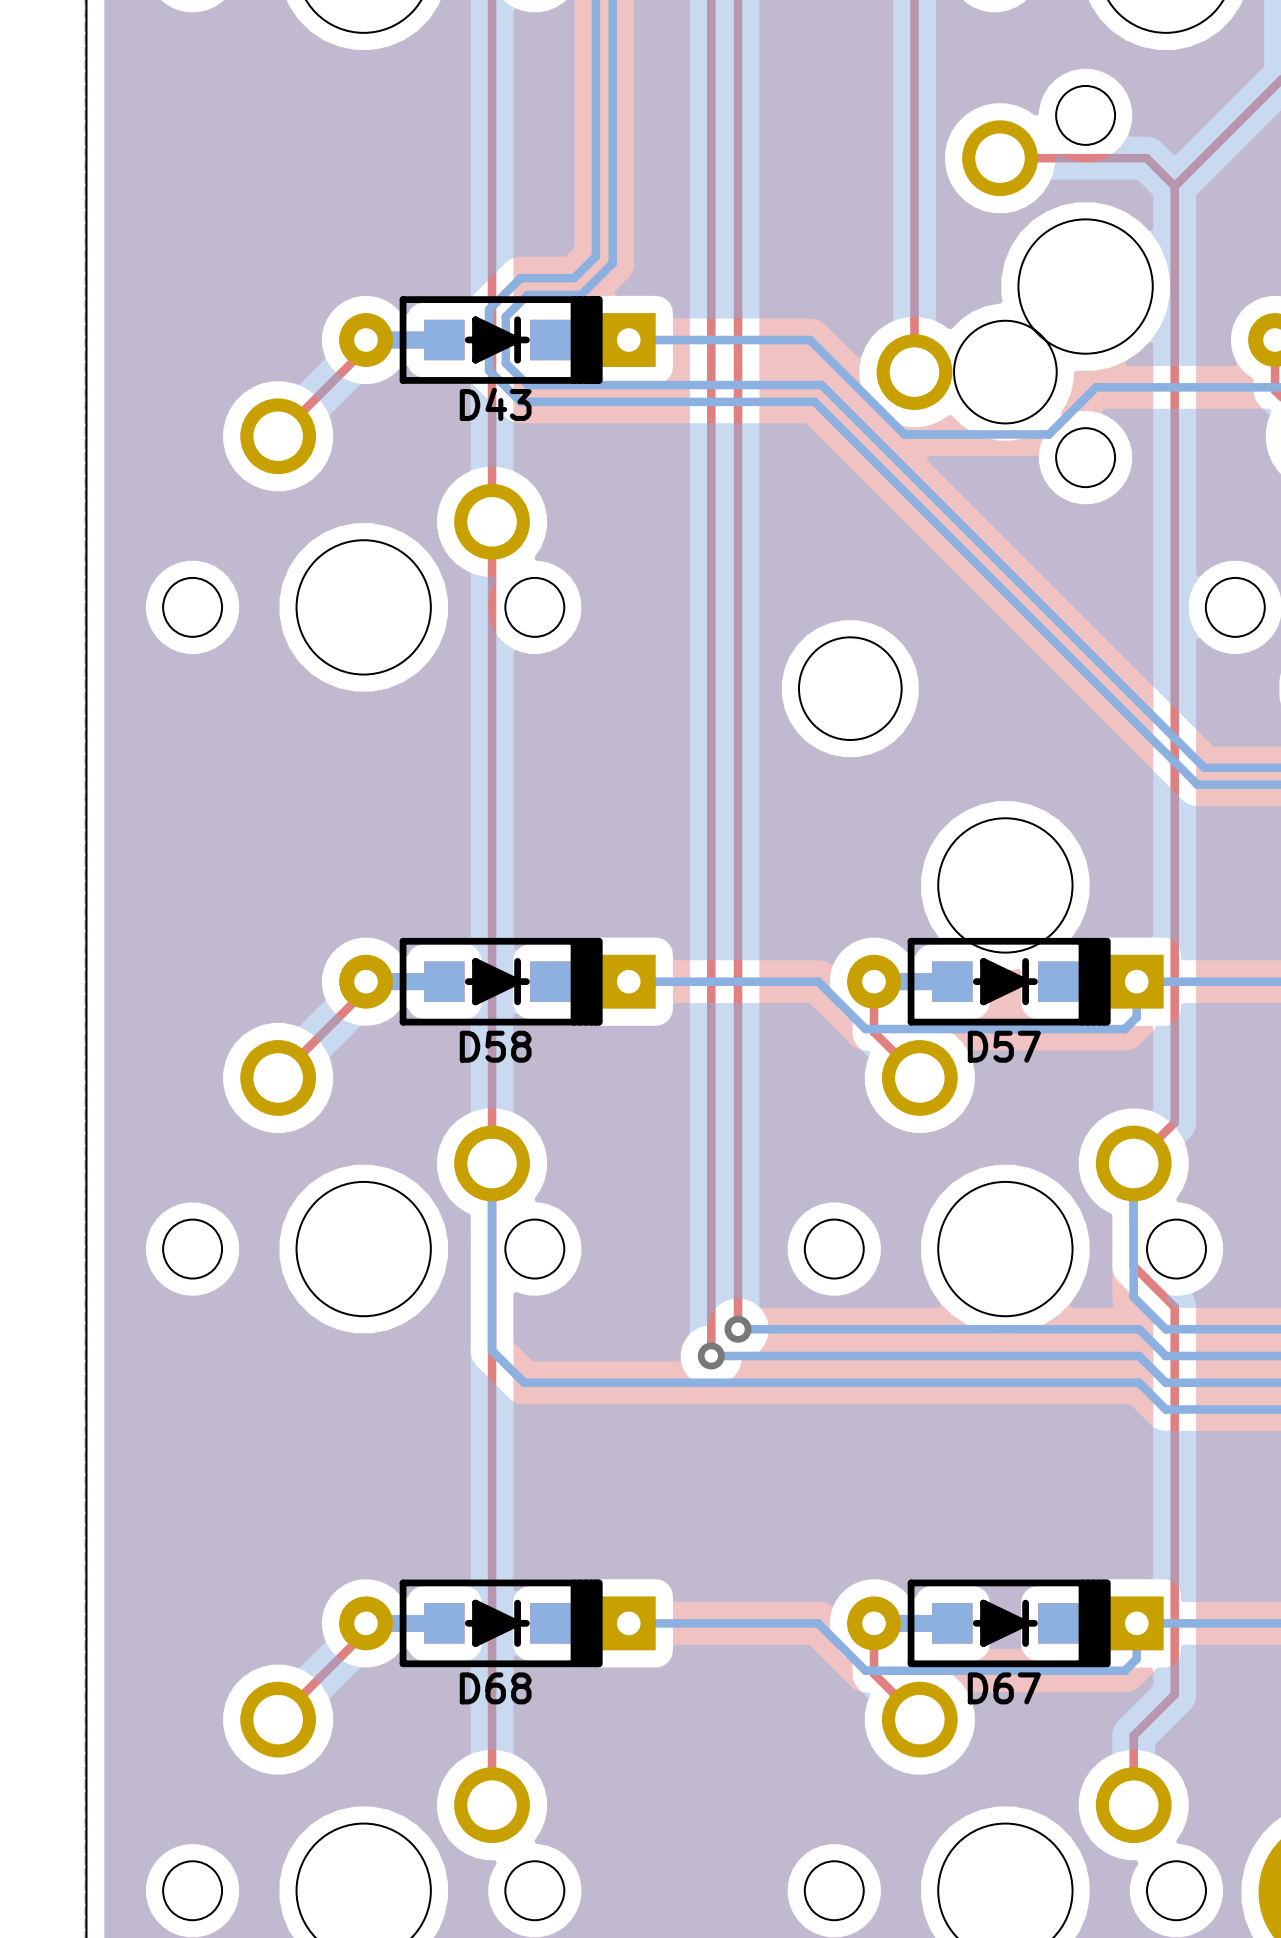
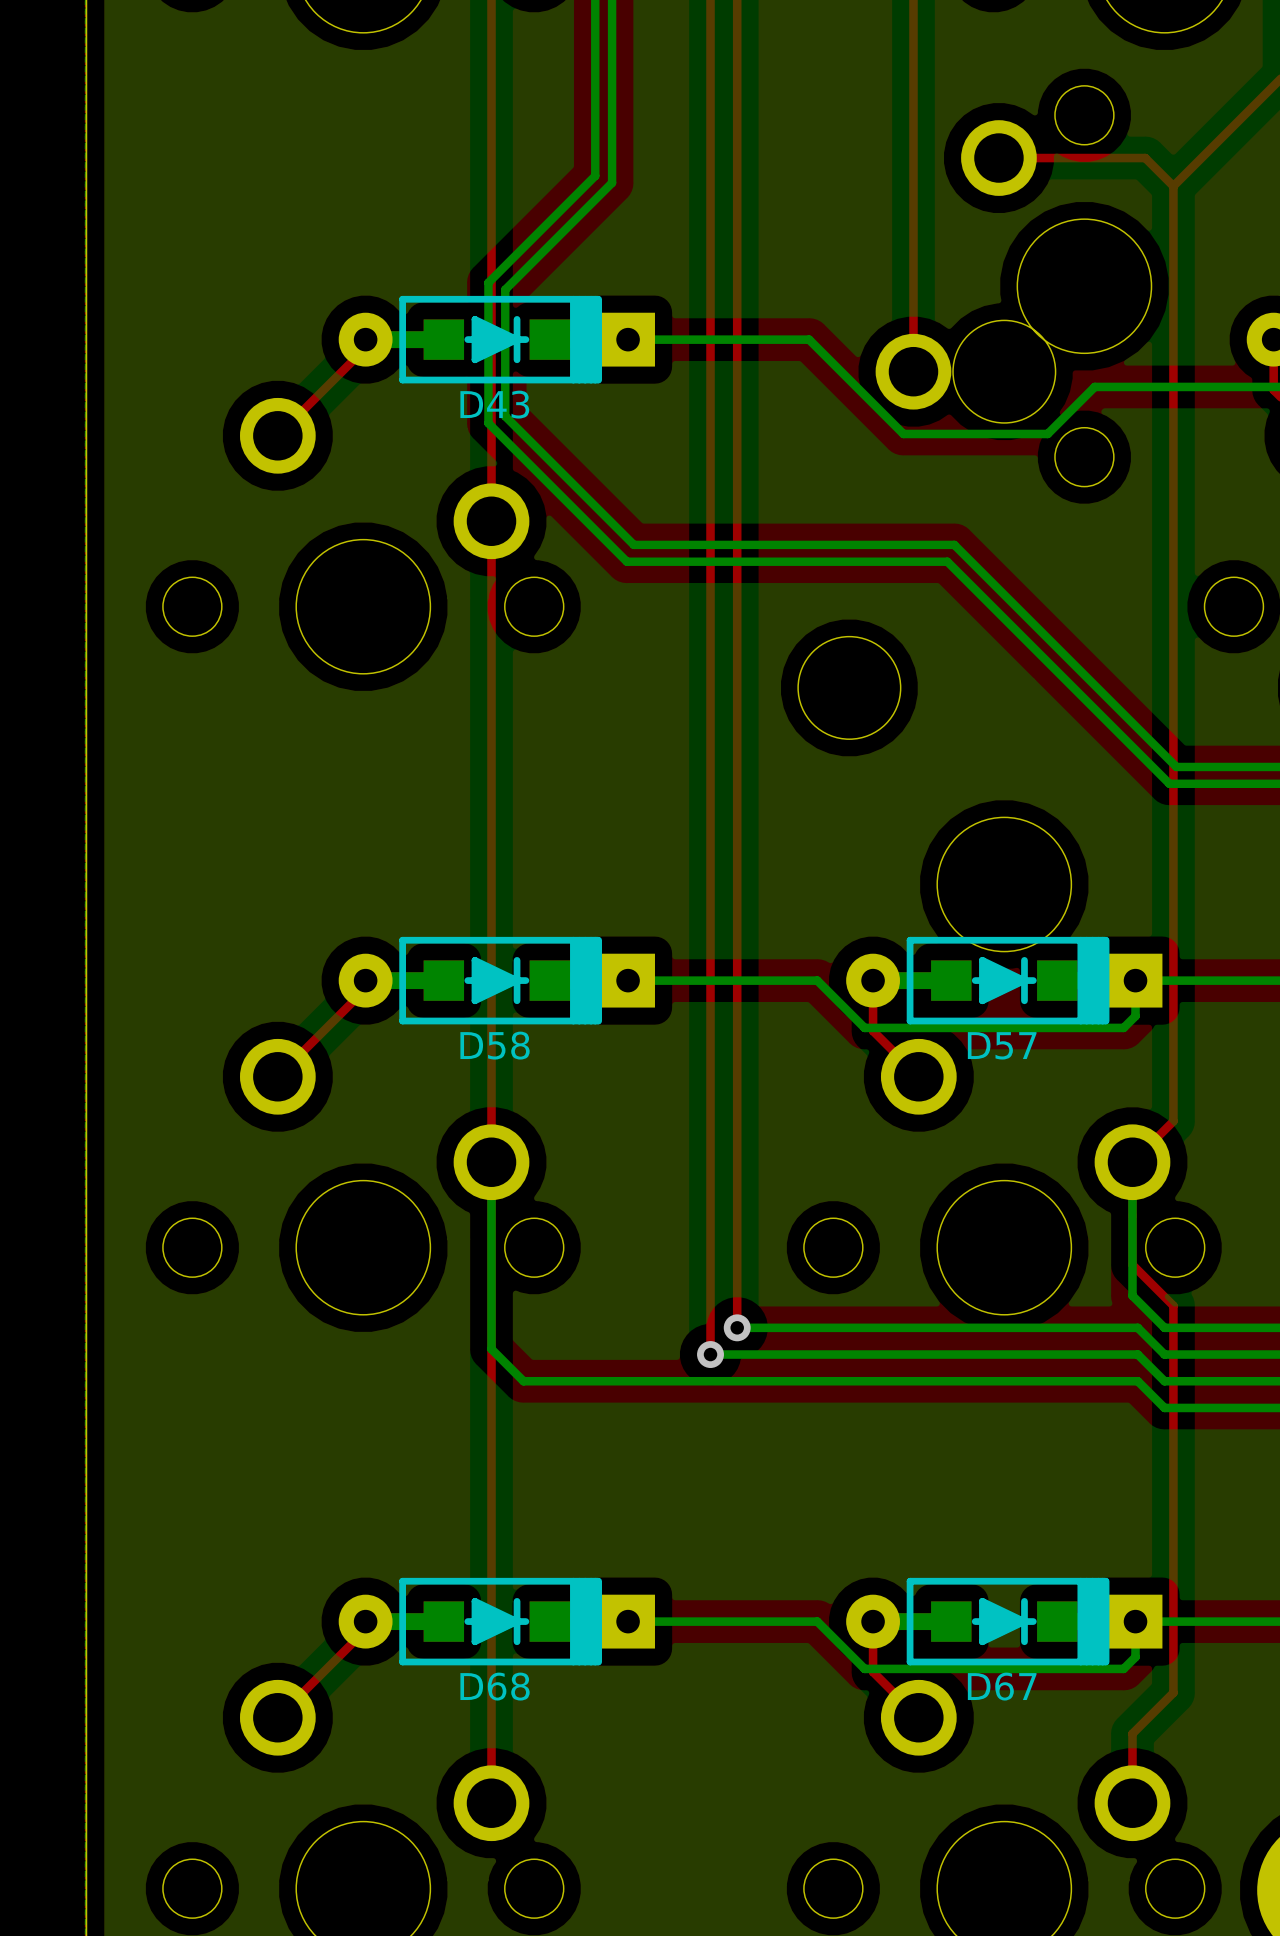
bottom track: (595, 176) (595, 256) (574, 278) (520, 278) (488, 309) -> (595, 175) (488, 282) (488, 309)
bottom track: (612, 183) (612, 263) (581, 294) (527, 294) (505, 316) -> (612, 182) (505, 289) (505, 316)
bottom track: (505, 363) (527, 385) (821, 385) (1204, 767) -> (505, 362) (505, 416) (633, 544) (954, 544) (1176, 766) (1203, 766)
bottom track: (488, 370) (520, 401) (814, 401) (1197, 784) -> (488, 369) (488, 423) (626, 561) (947, 561) (1169, 783) (1196, 783)

